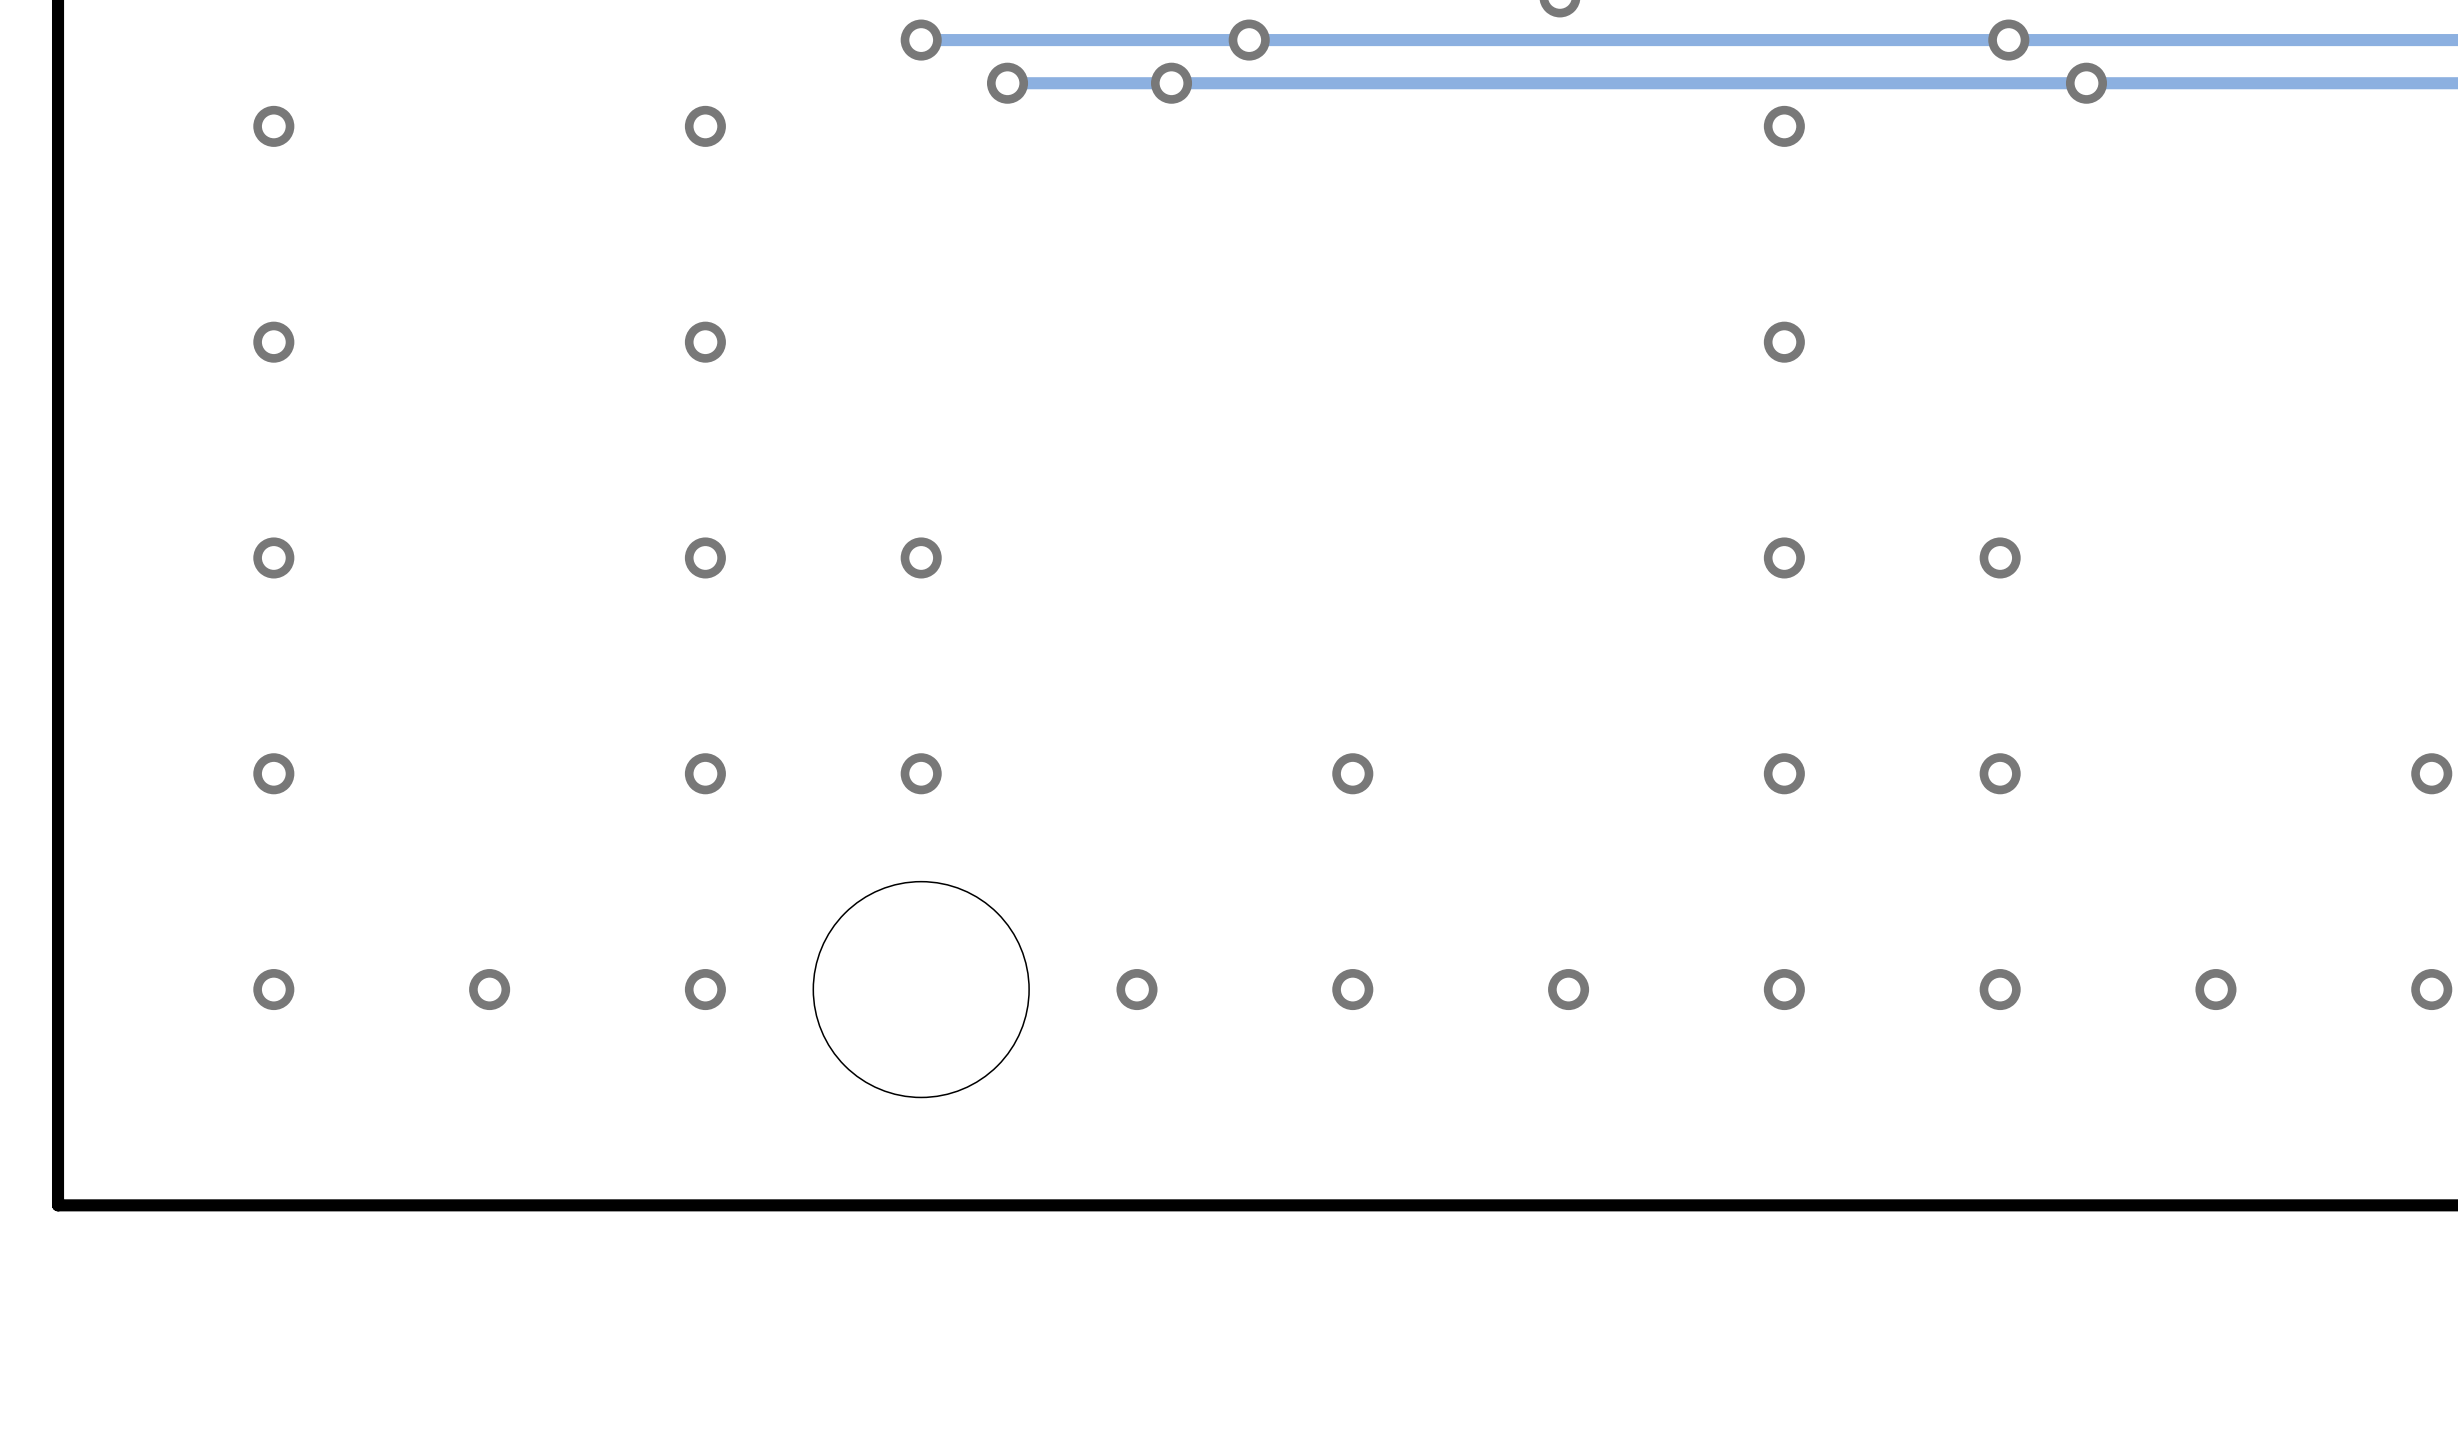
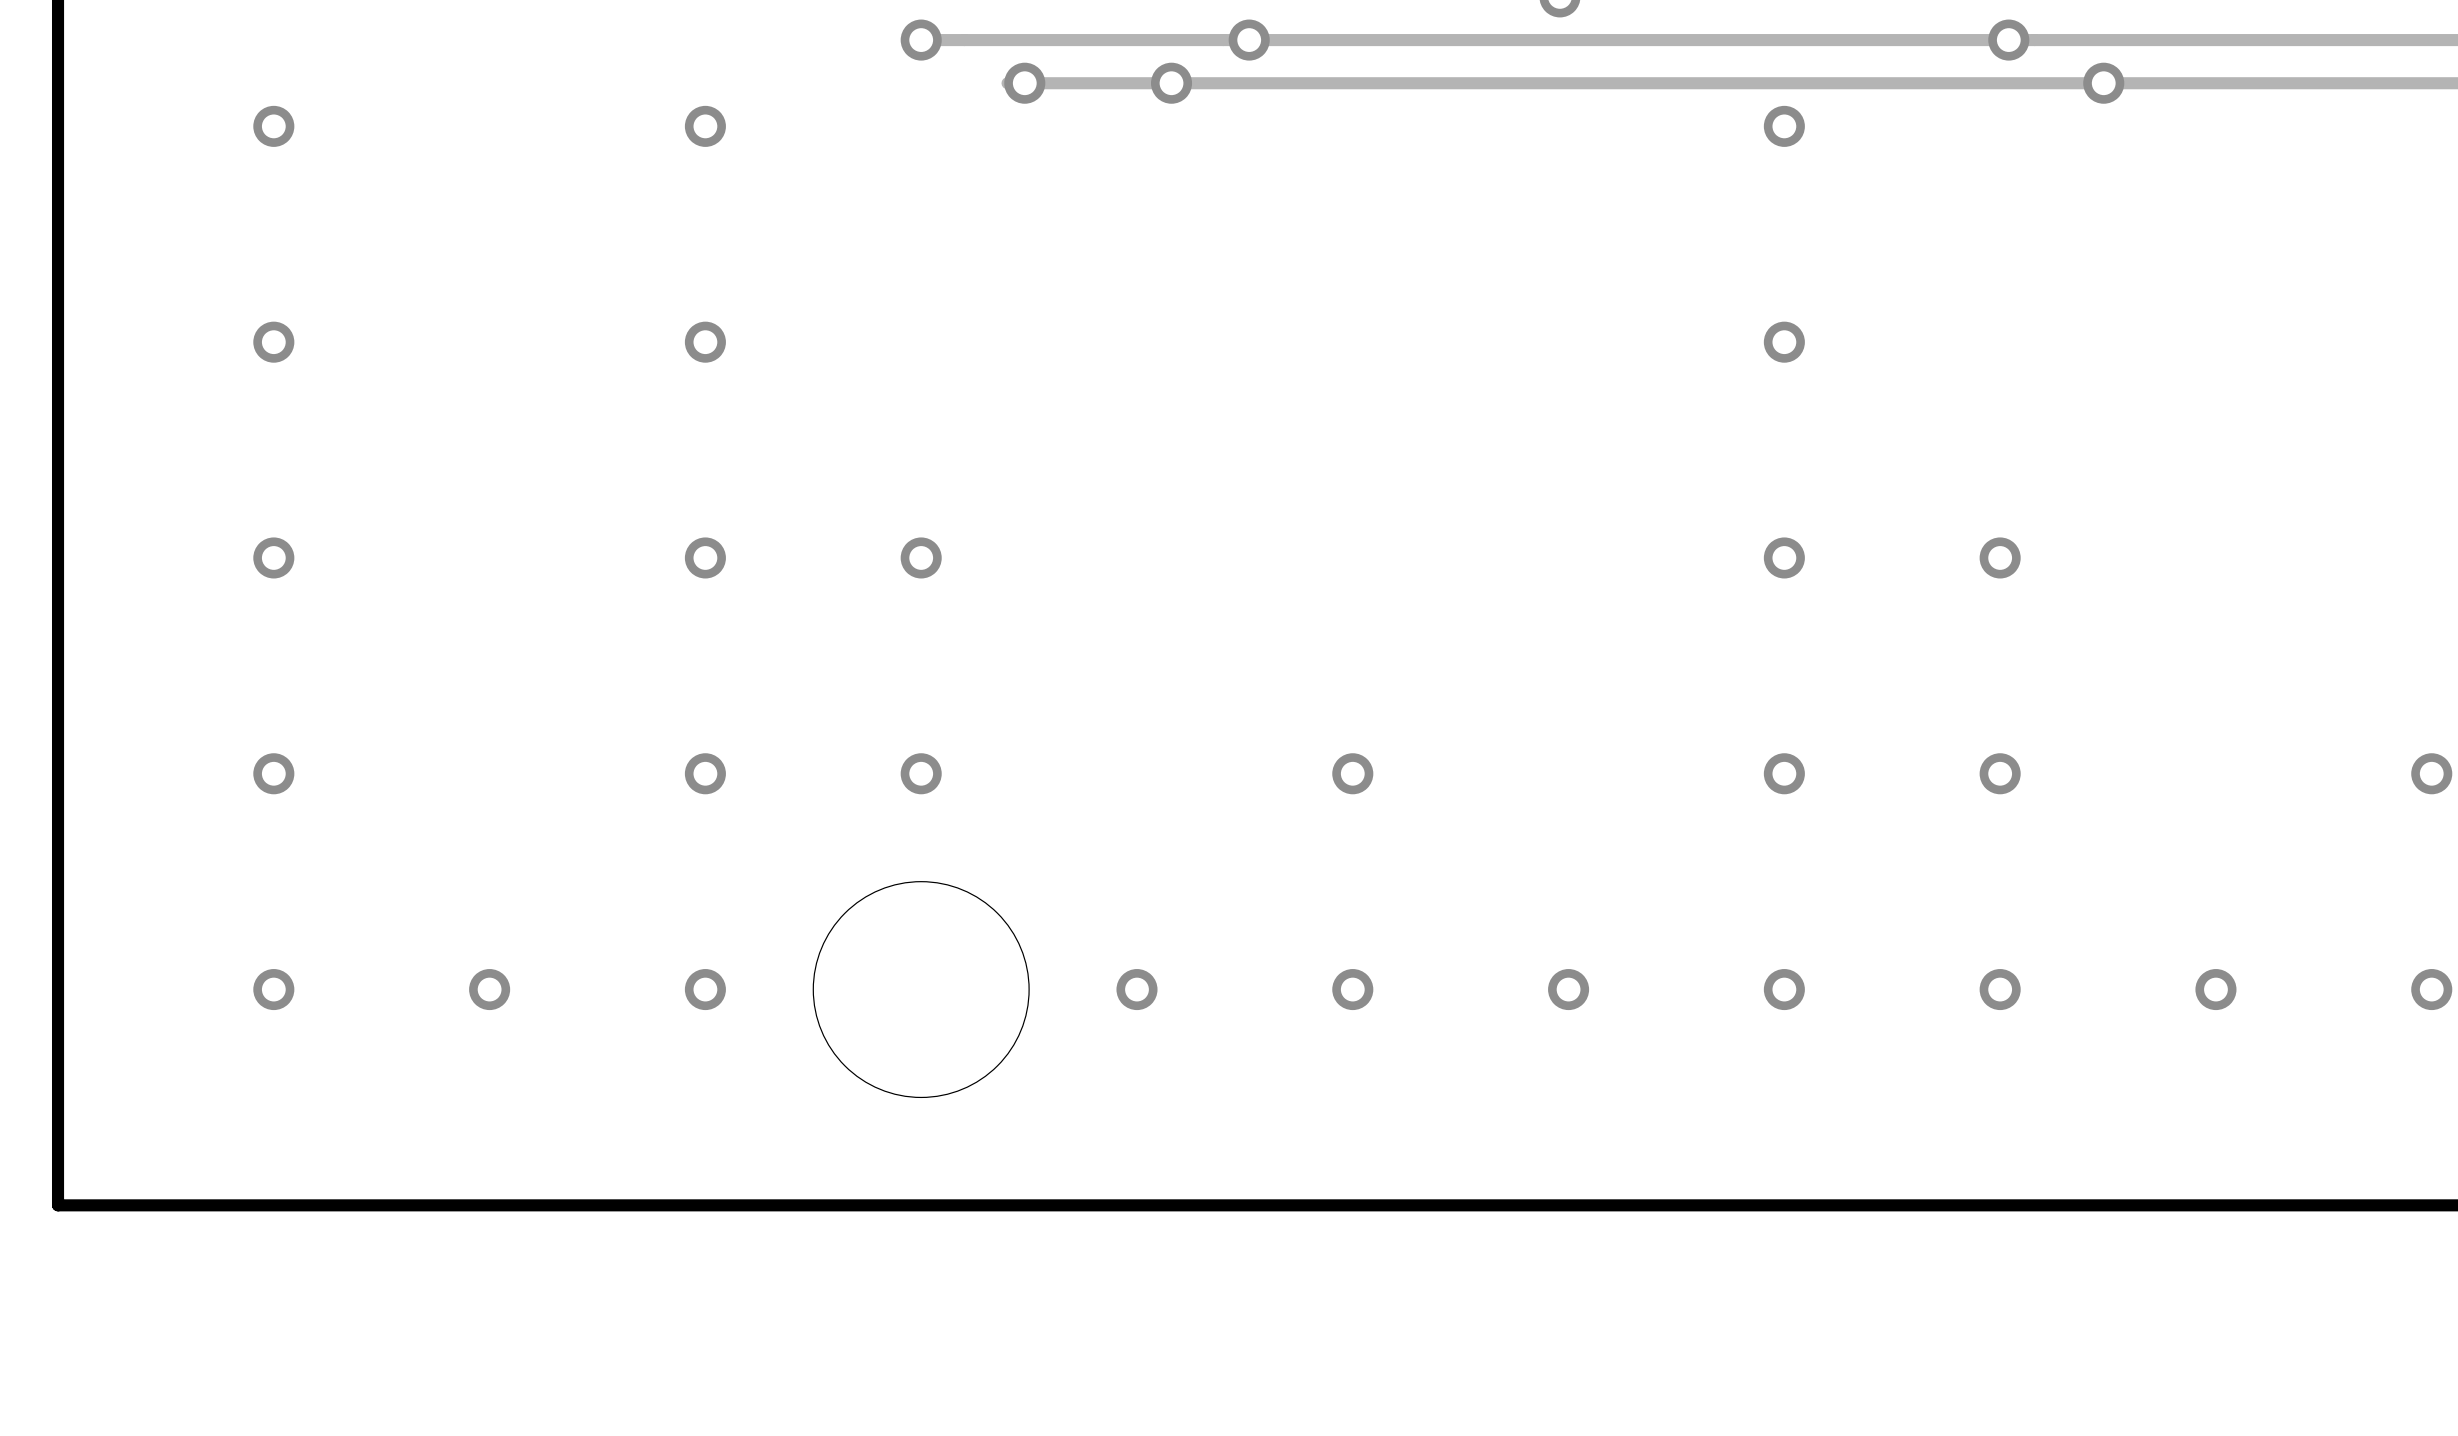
via position: (1007, 83) -> (1024, 83)
via position: (2086, 83) -> (2103, 83)

